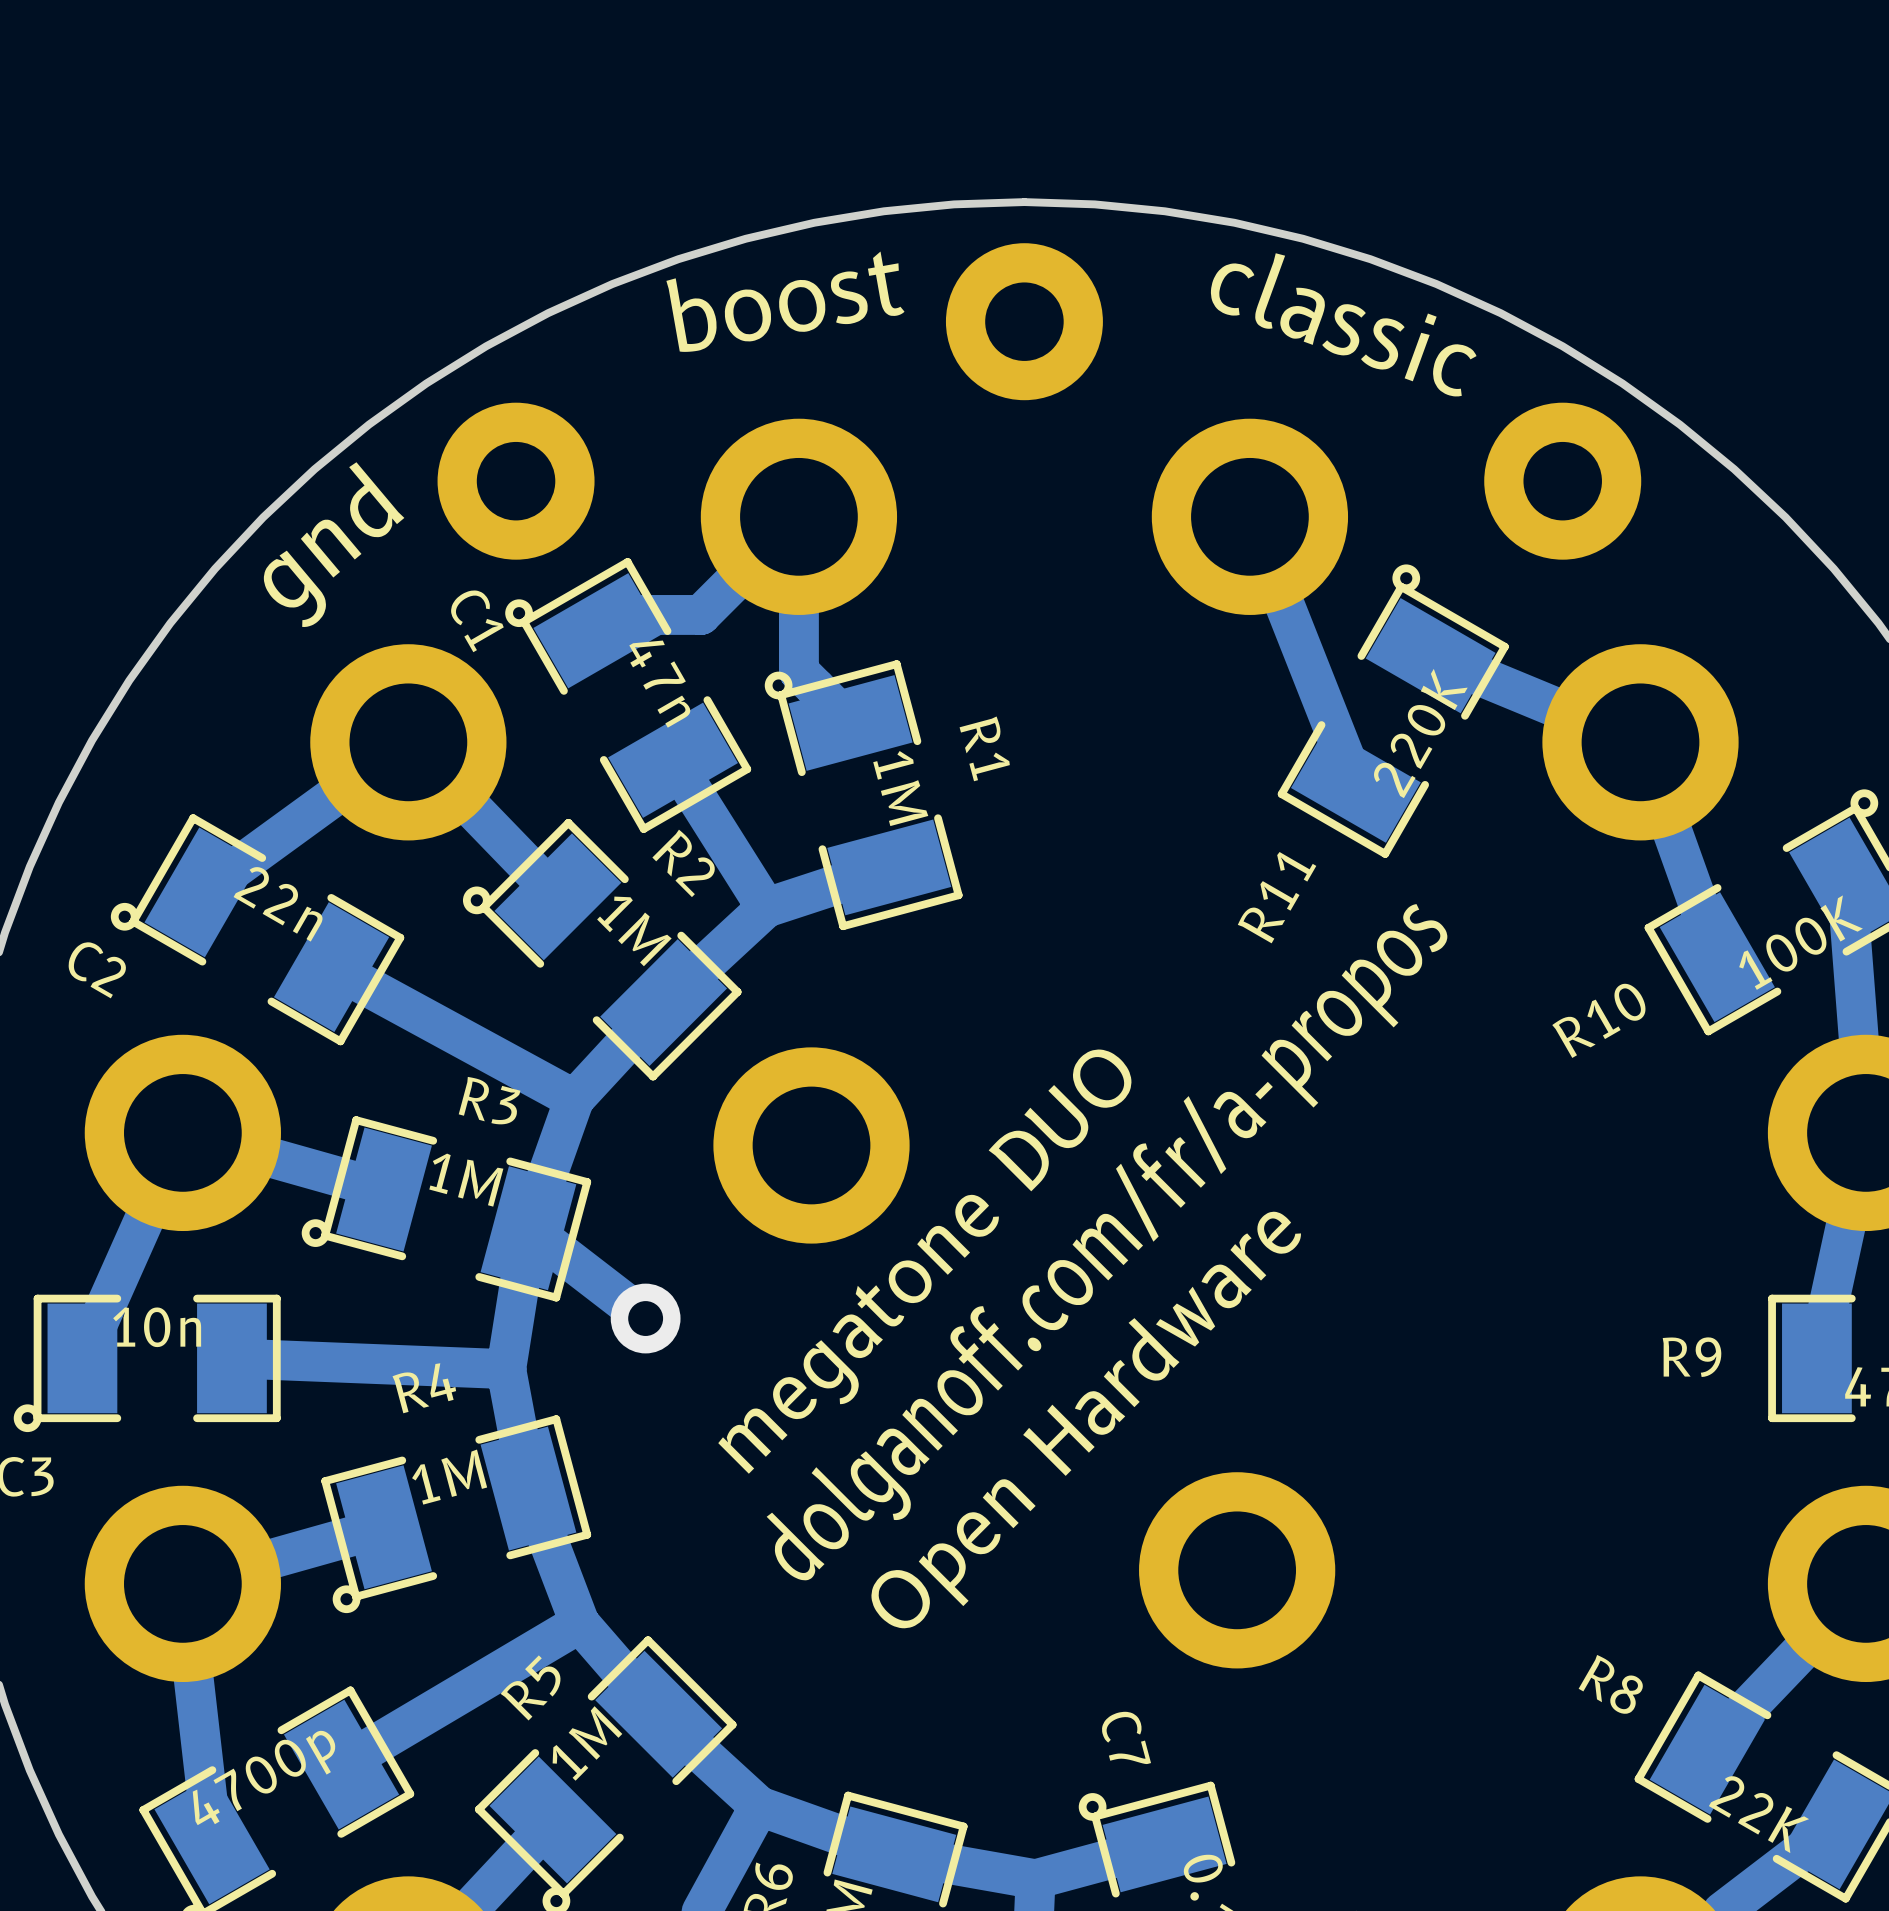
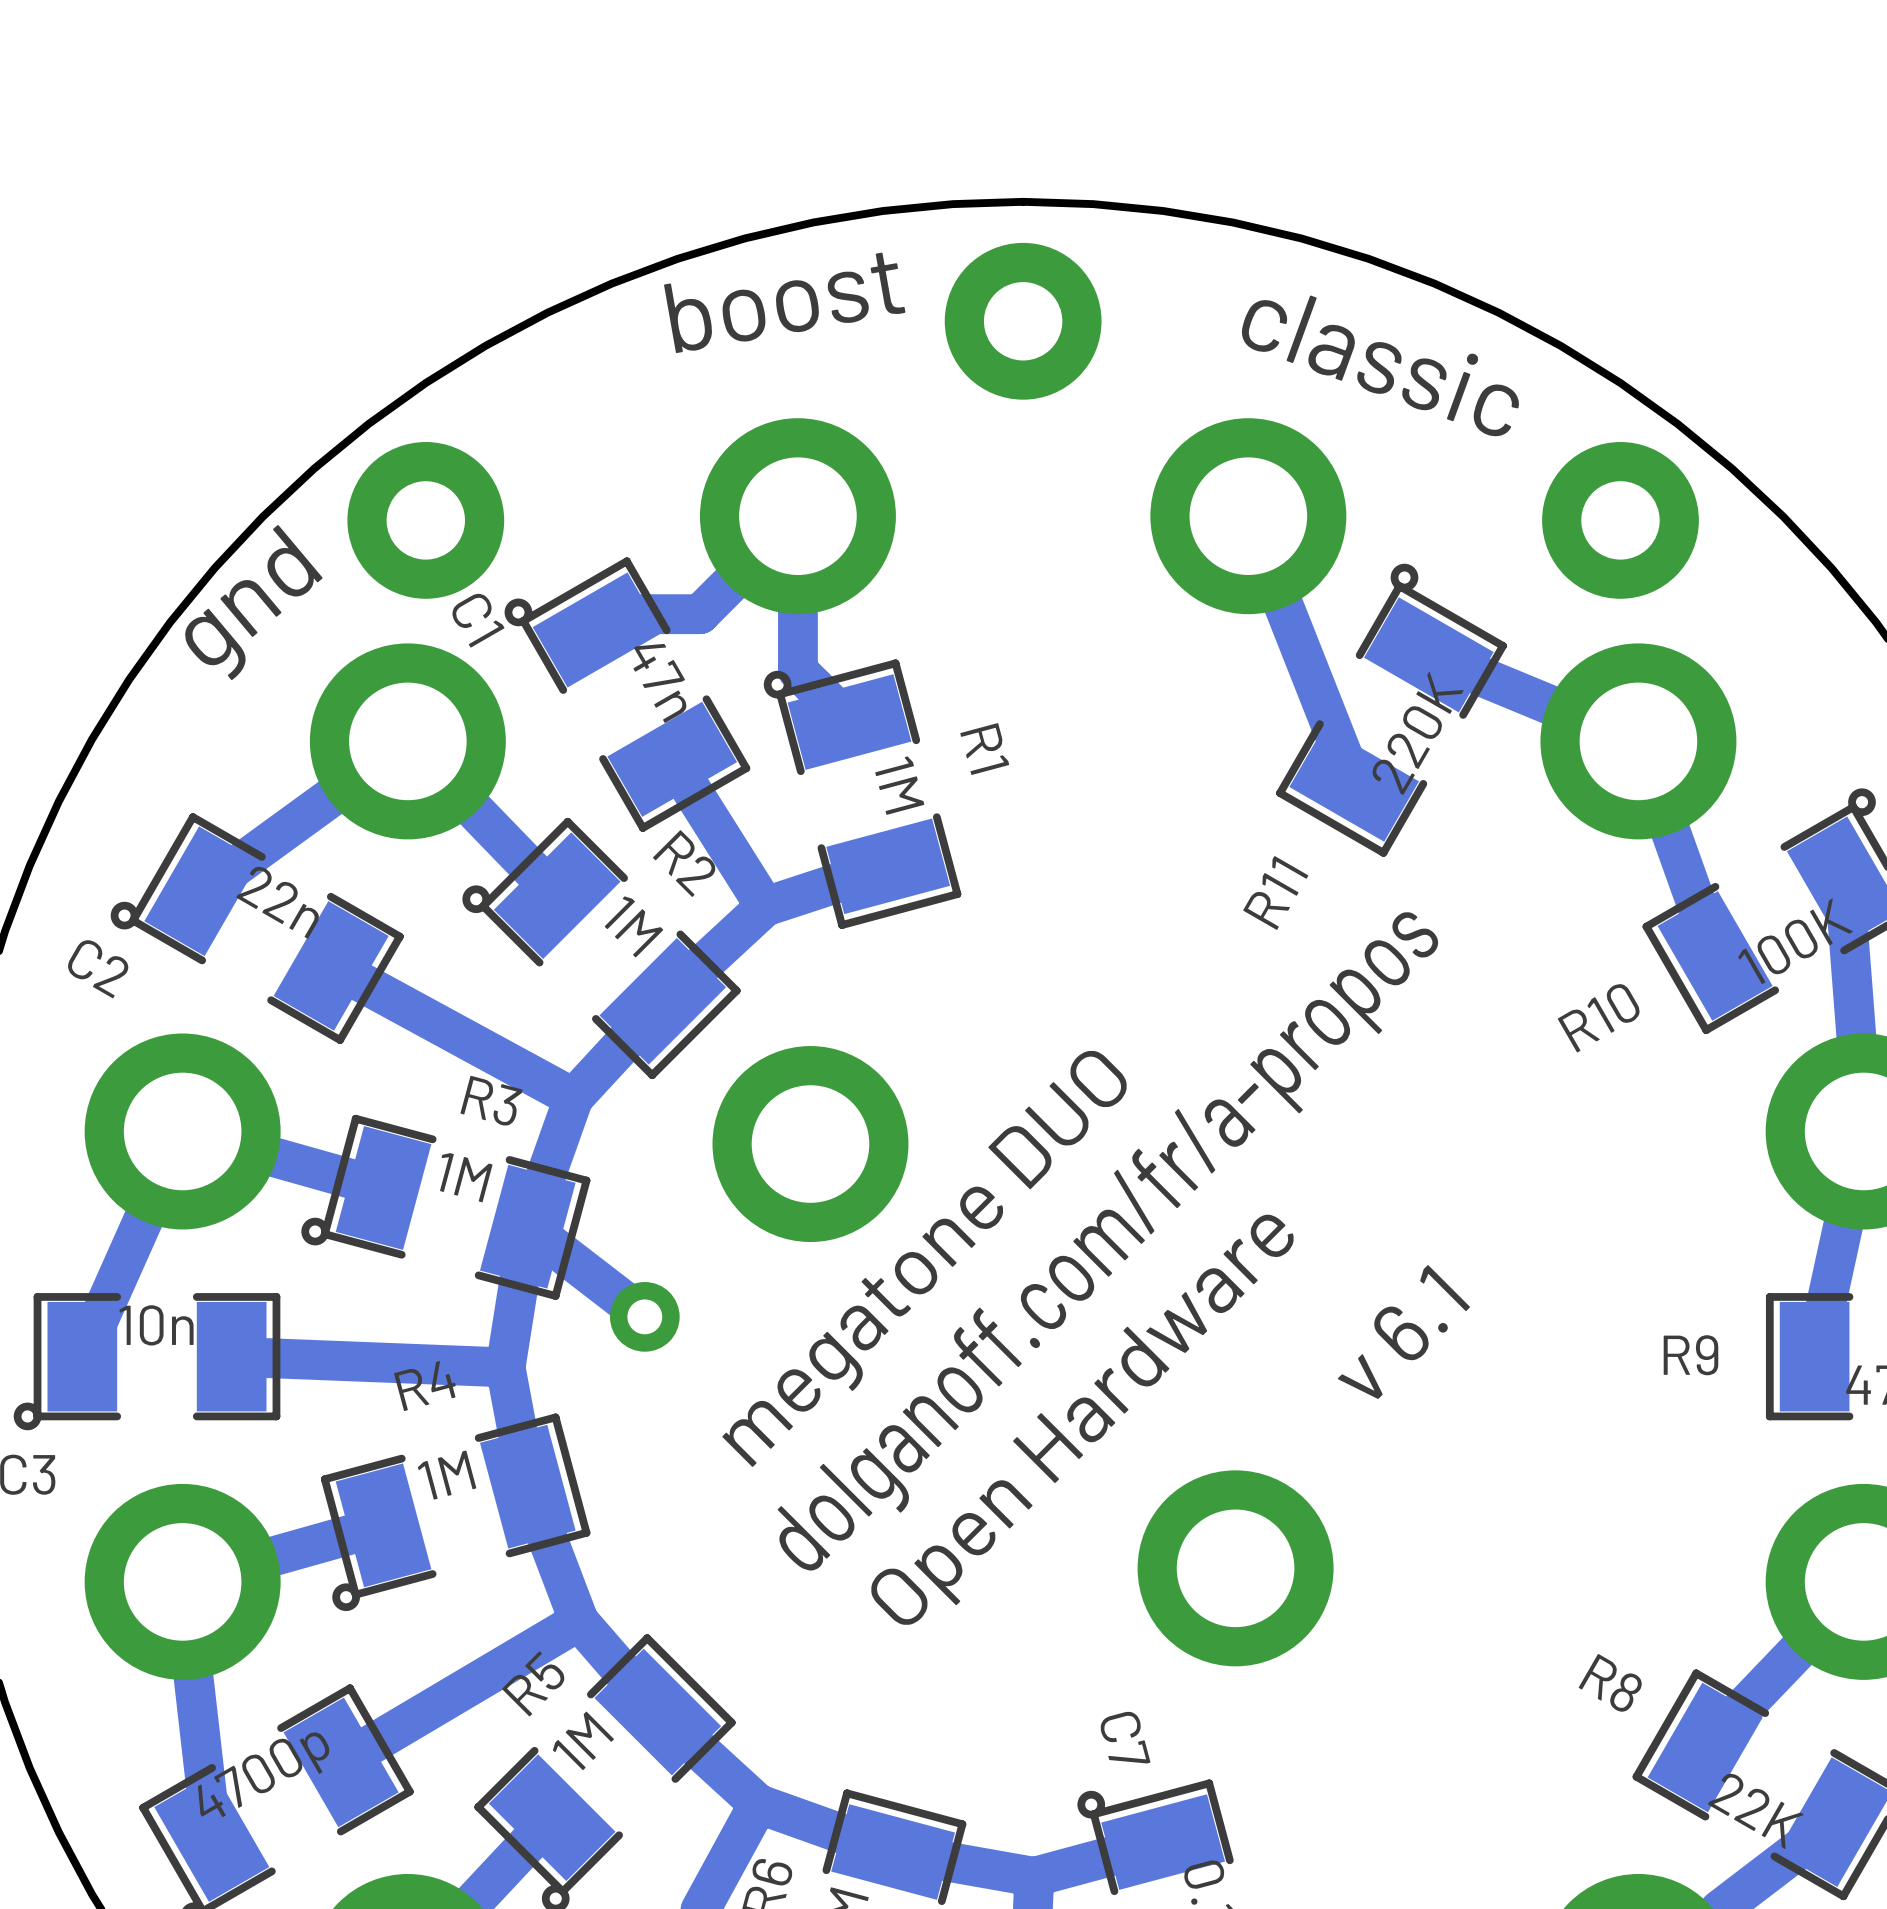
text position: classic (1343, 324) -> classic (1380, 366)
part position: (516, 481) -> (425, 520)
part position: (1562, 481) -> (1620, 520)
text position: gnd (334, 544) -> gnd (253, 602)
text: none -> v 6.1 (1403, 1331)

